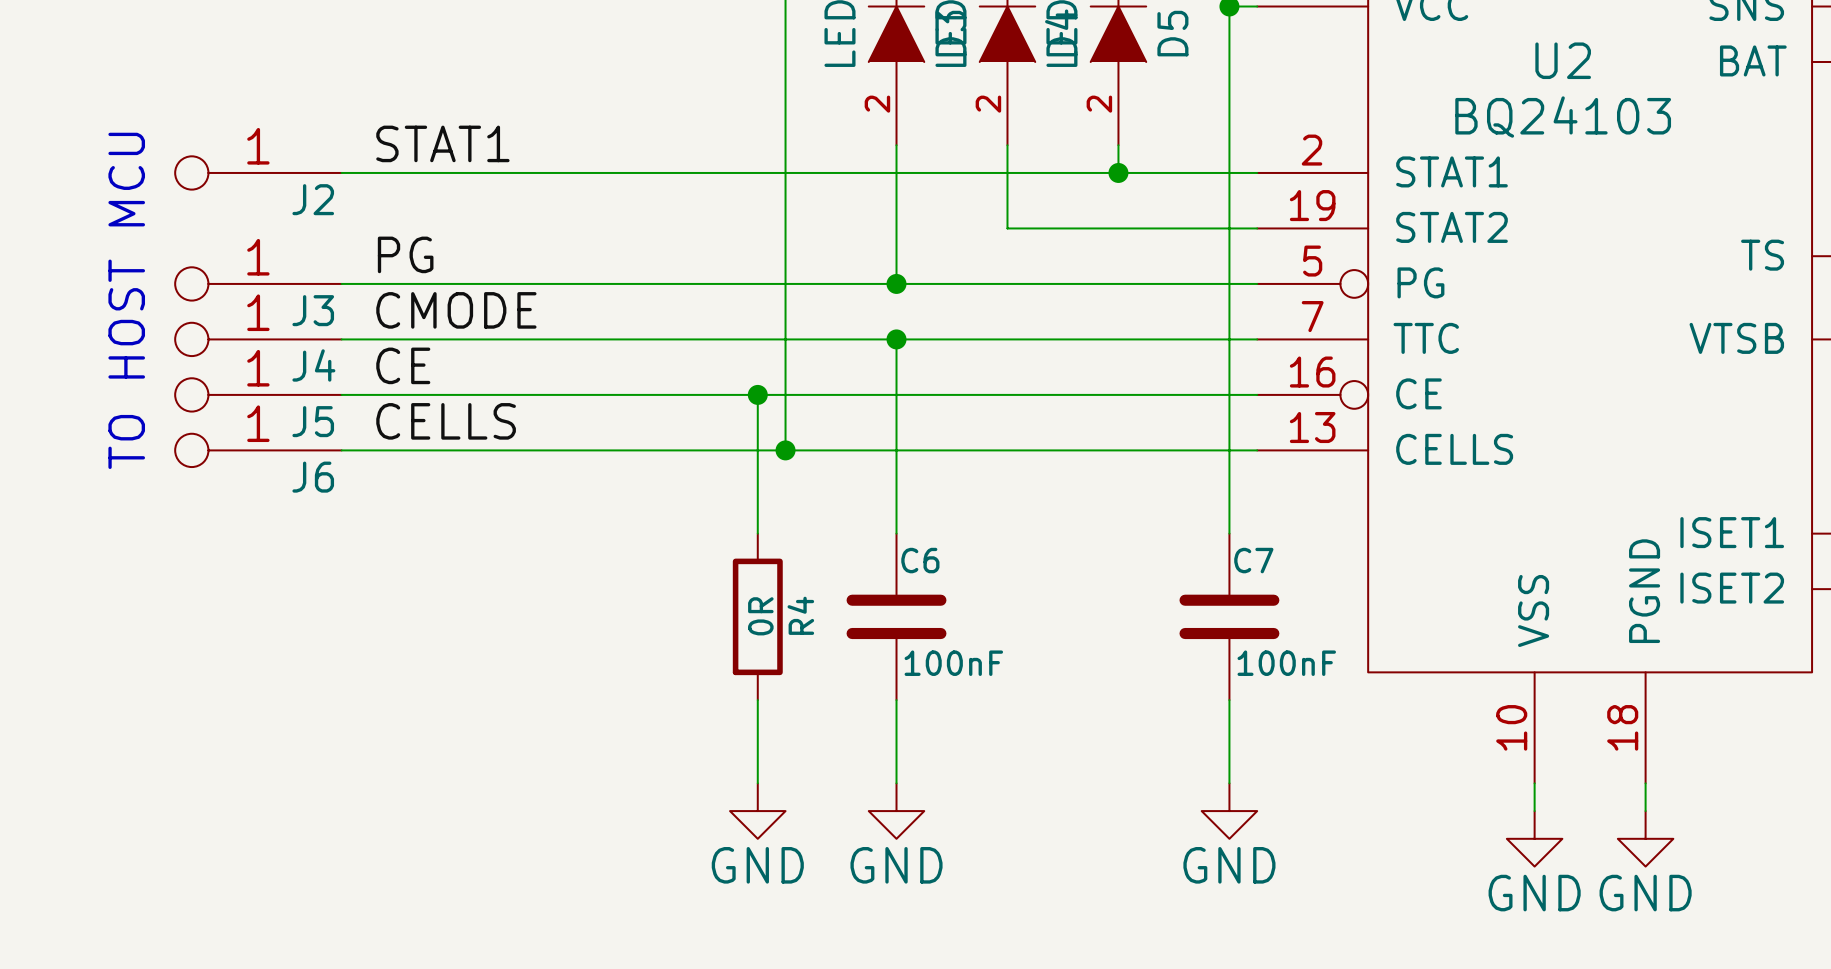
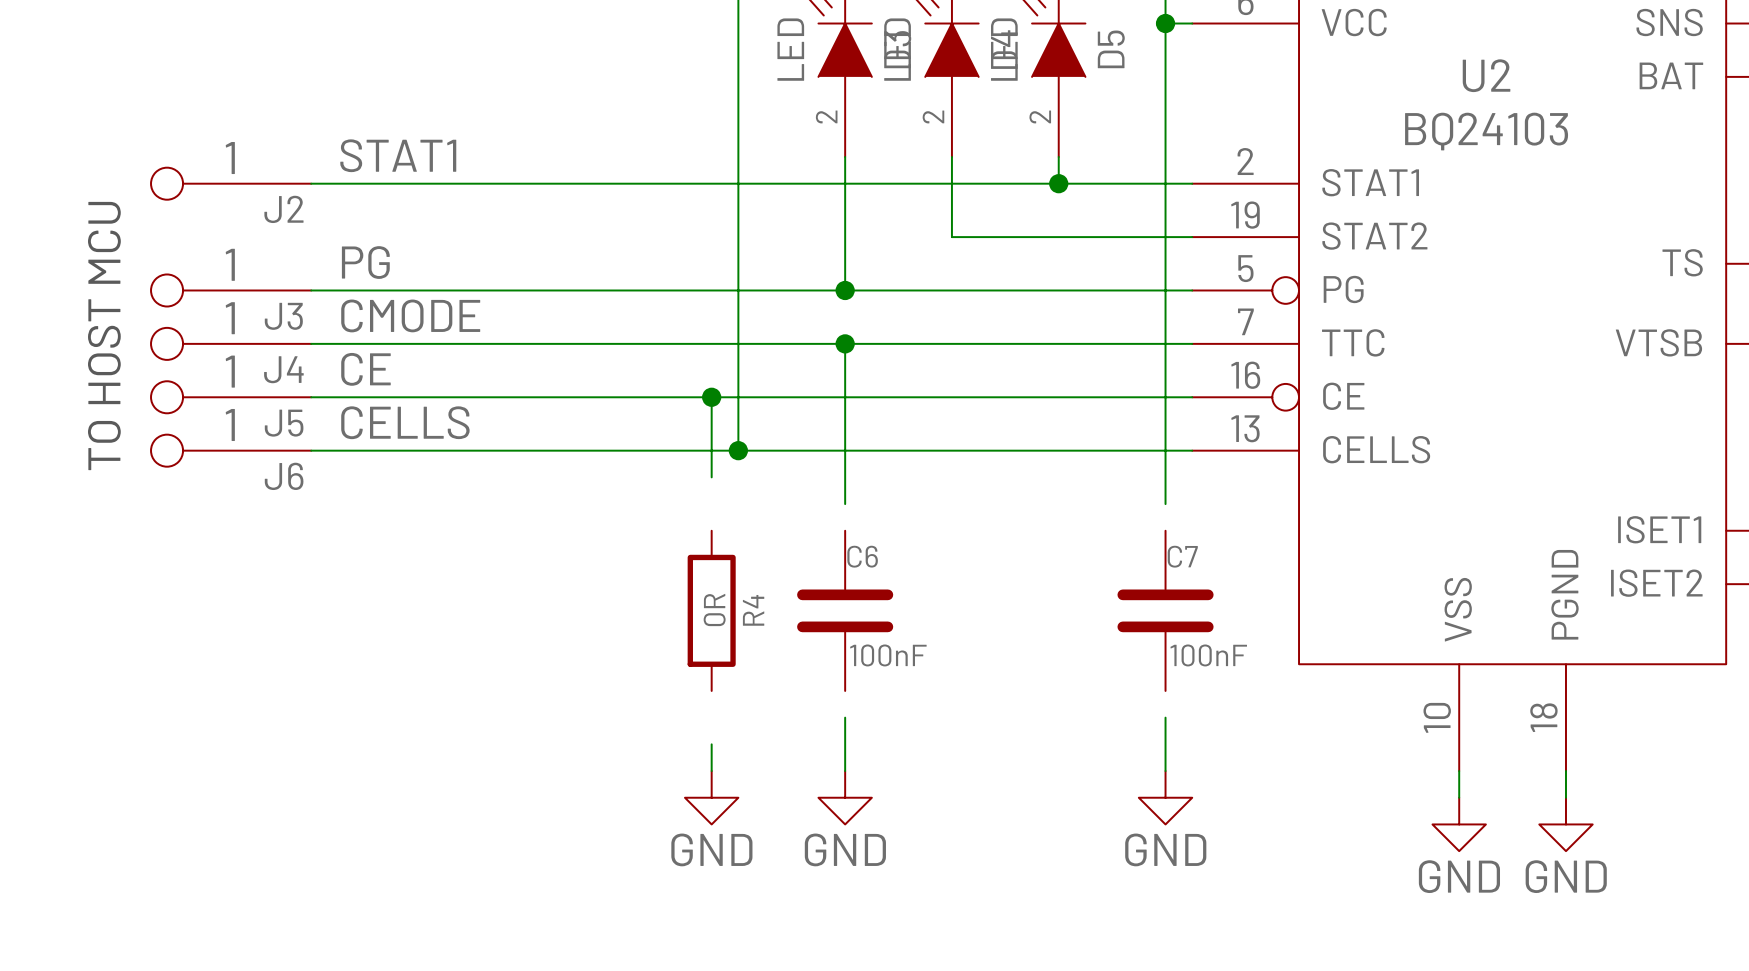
wire: (757, 478) (757, 533) -> none
wire: (896, 505) (896, 533) -> none
wire: (1229, 505) (1229, 533) -> none
wire: (757, 700) (757, 755) -> none
wire: (896, 700) (896, 727) -> none
wire: (1229, 700) (1229, 727) -> none

